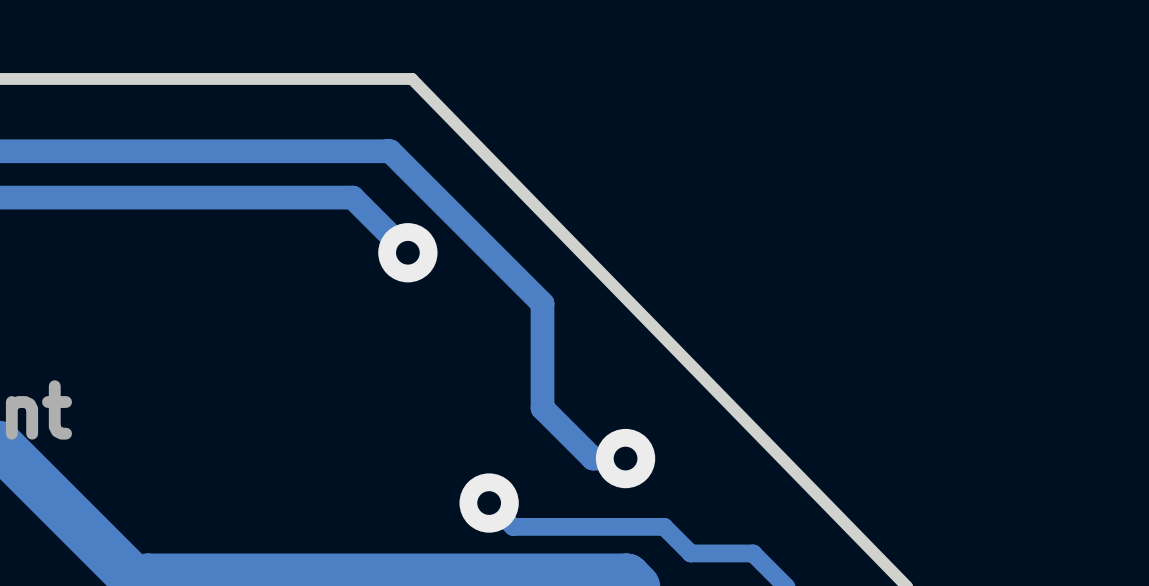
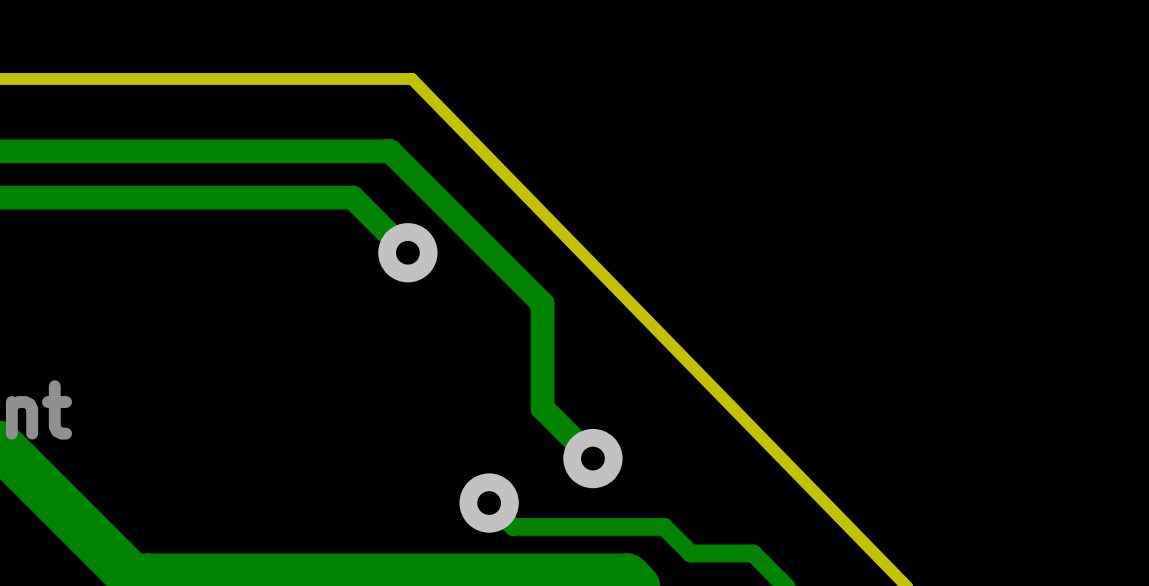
via position: (625, 458) -> (592, 458)

